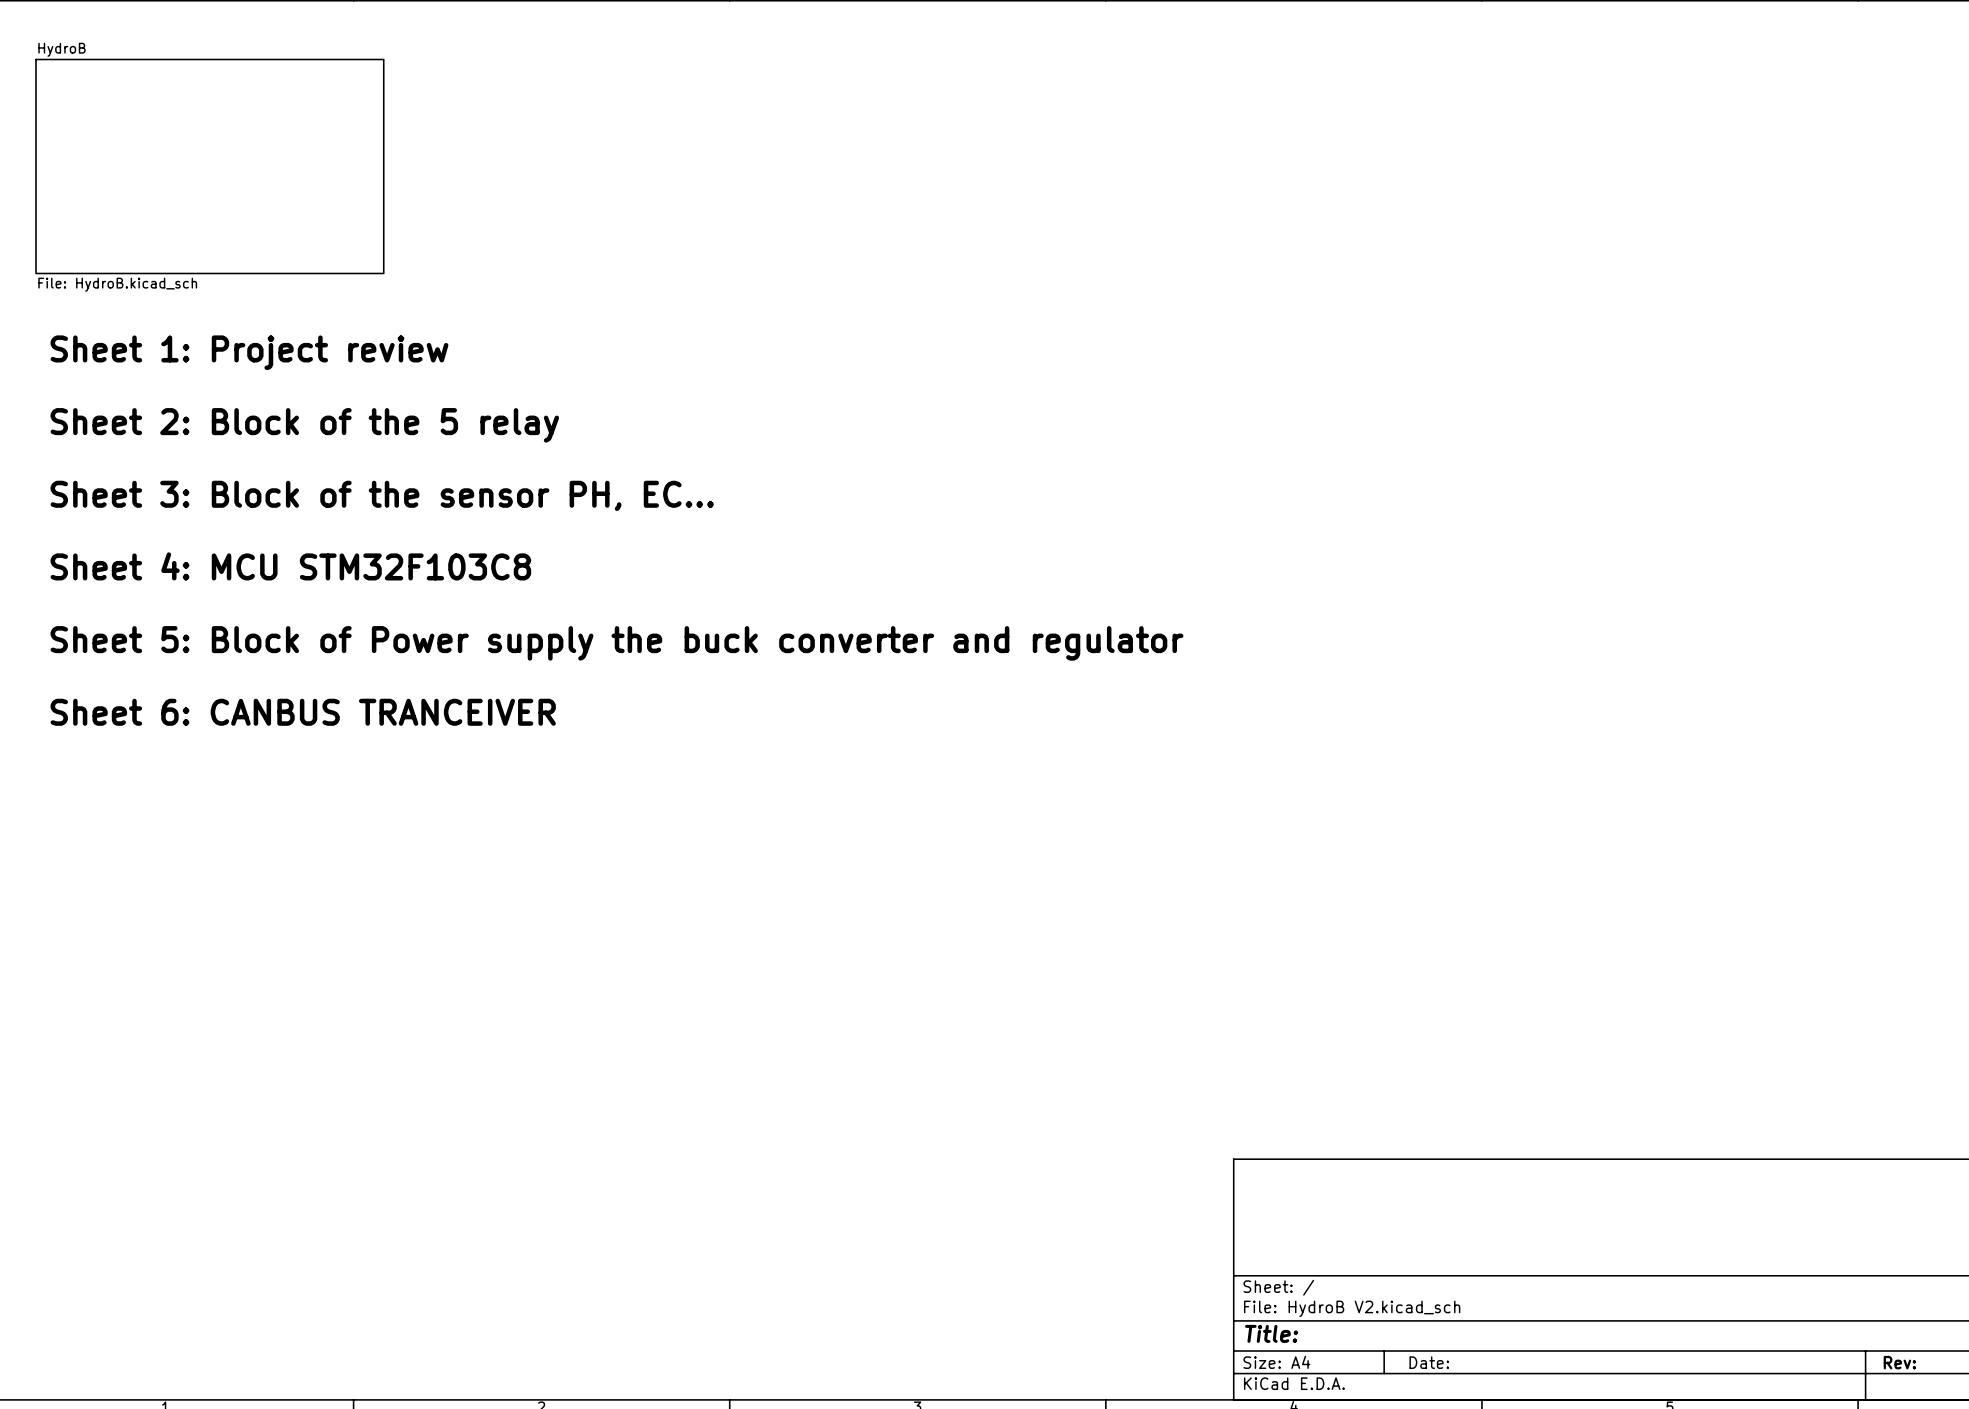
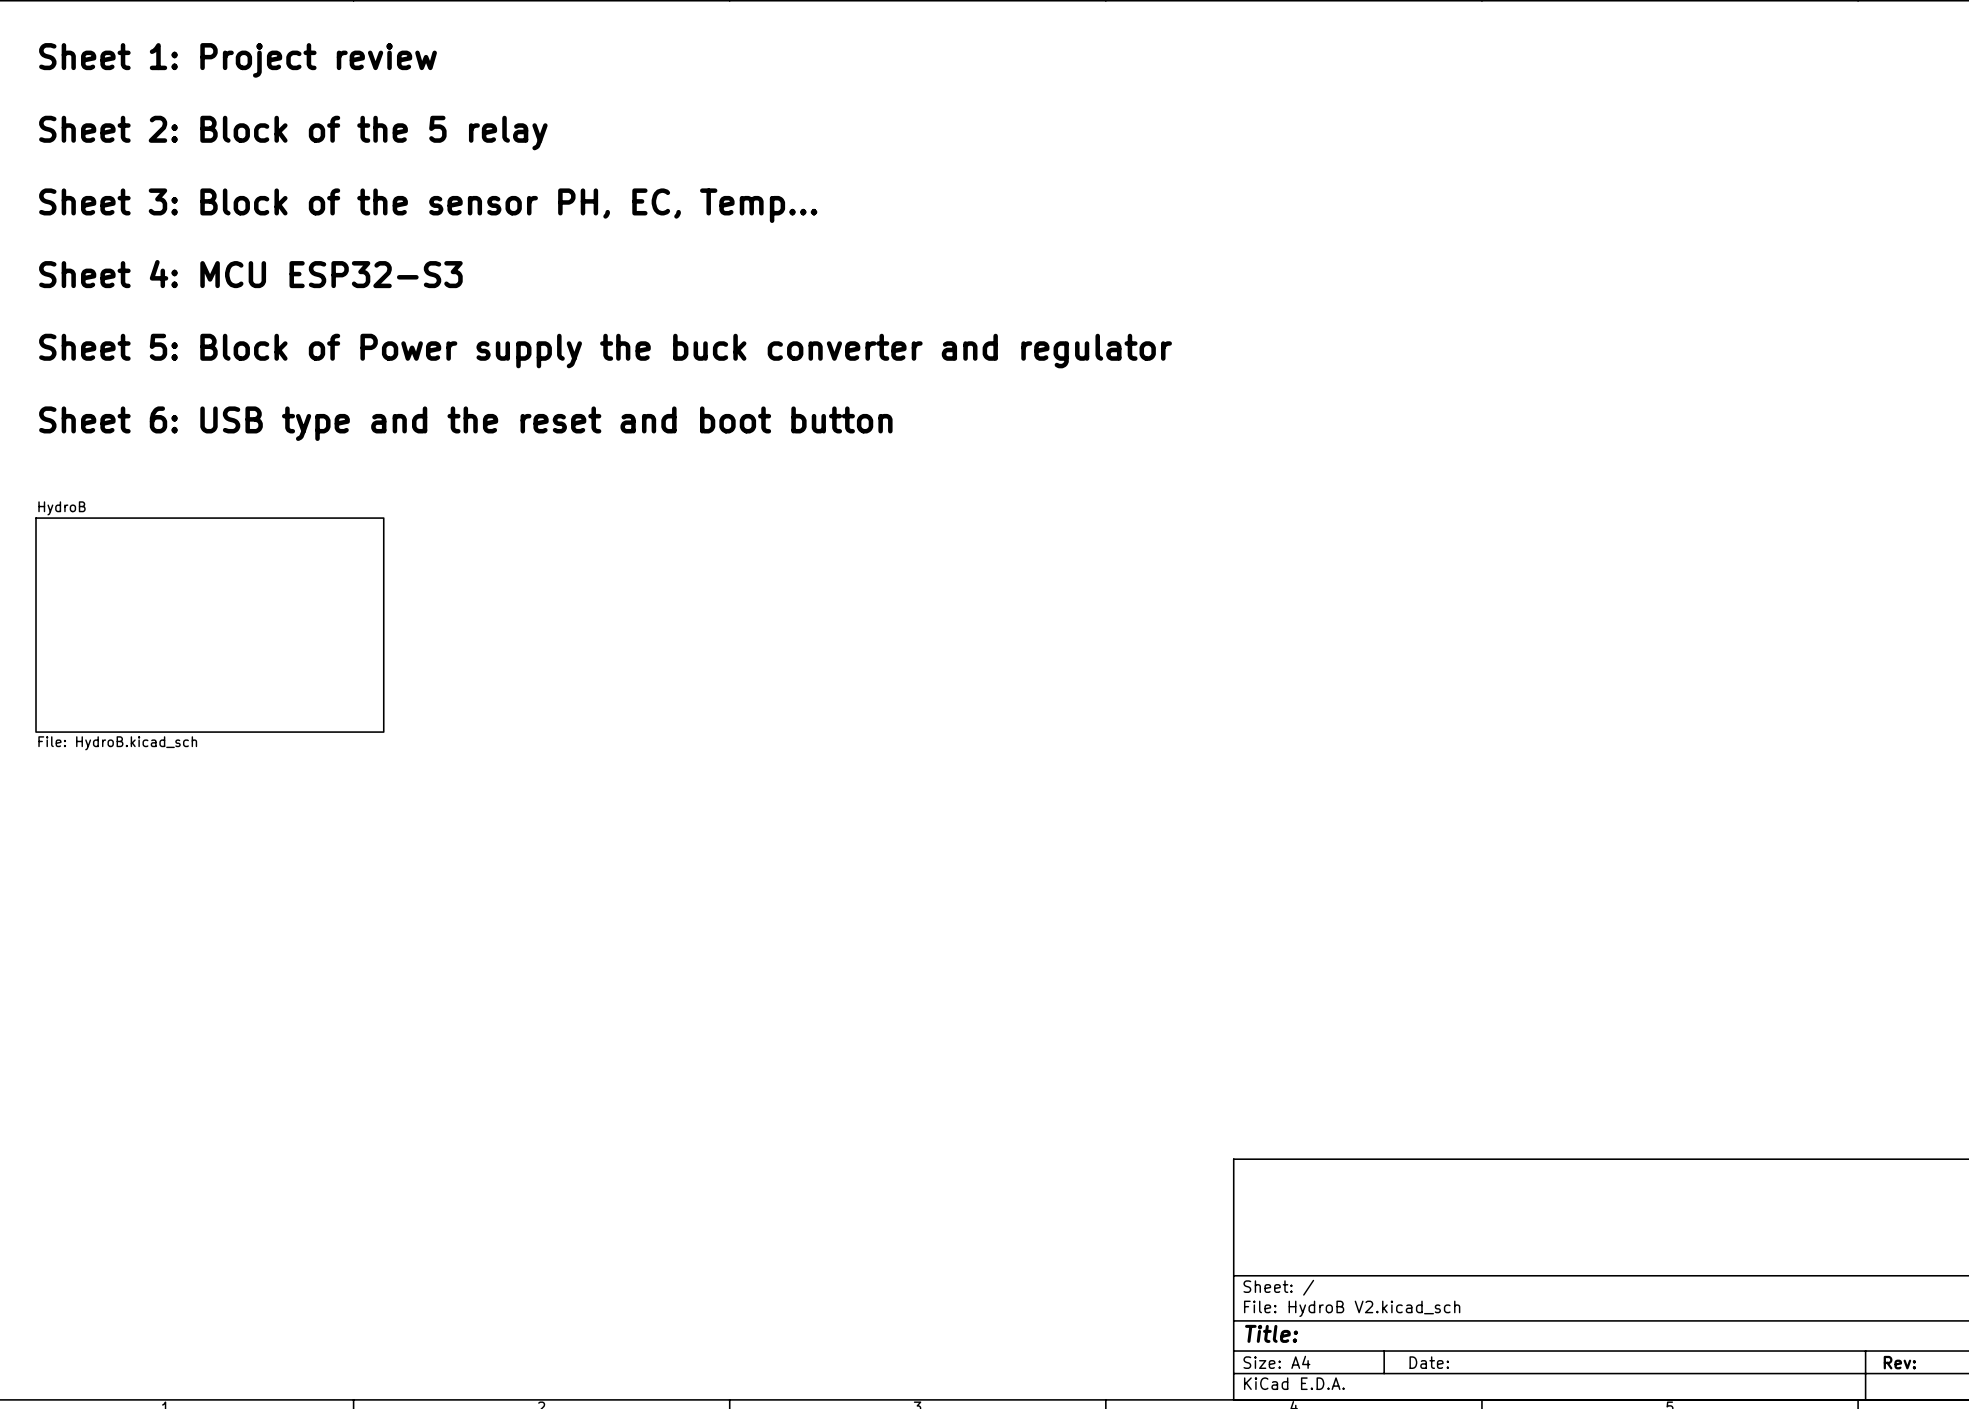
text: none -> Sheet 1: Project review (238, 60)
text: none -> Sheet 2: Block of the 5 relay (293, 133)
sheet HydroB: File: HydroB.kicad_sch (209, 166) -> none
text: none -> Sheet 3: Block of the sensor PH, EC, Temp... (428, 205)
text: none -> Sheet 4: MCU ESP32-S3 (250, 274)
text: none -> Sheet 5: Block of Power supply the buck converter and regulator (605, 351)
text: Sheet 1: Project review (249, 352) -> none
text: none -> Sheet 6: USB type and the reset and boot button (465, 423)
text: Sheet 2: Block of the 5 relay (304, 425) -> none
text: Sheet 3: Block of the sensor PH, EC... (382, 495) -> none
text: Sheet 4: MCU STM32F103C8 (290, 566) -> none
sheet HydroB: none -> File: HydroB.kicad_sch (209, 625)
text: Sheet 5: Block of Power supply the buck converter and regulator (617, 643) -> none
text: Sheet 6: CANBUS TRANCEIVER (303, 712) -> none

